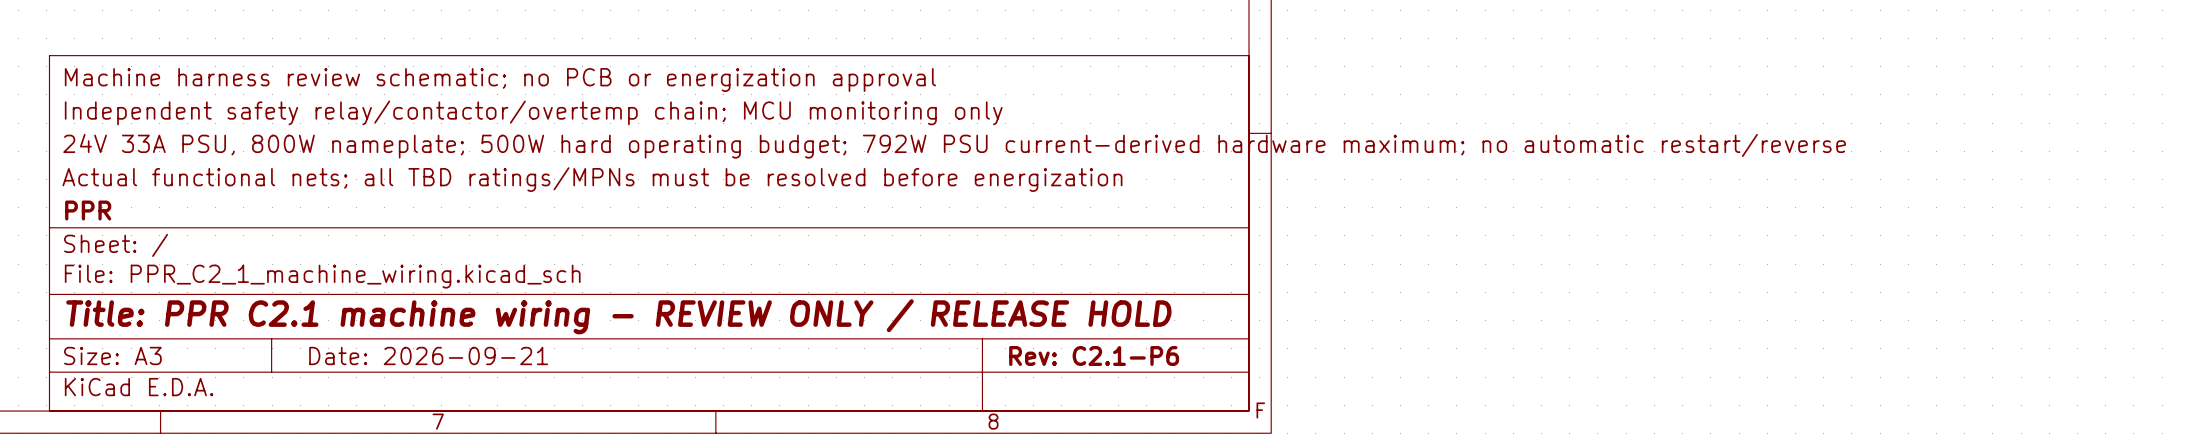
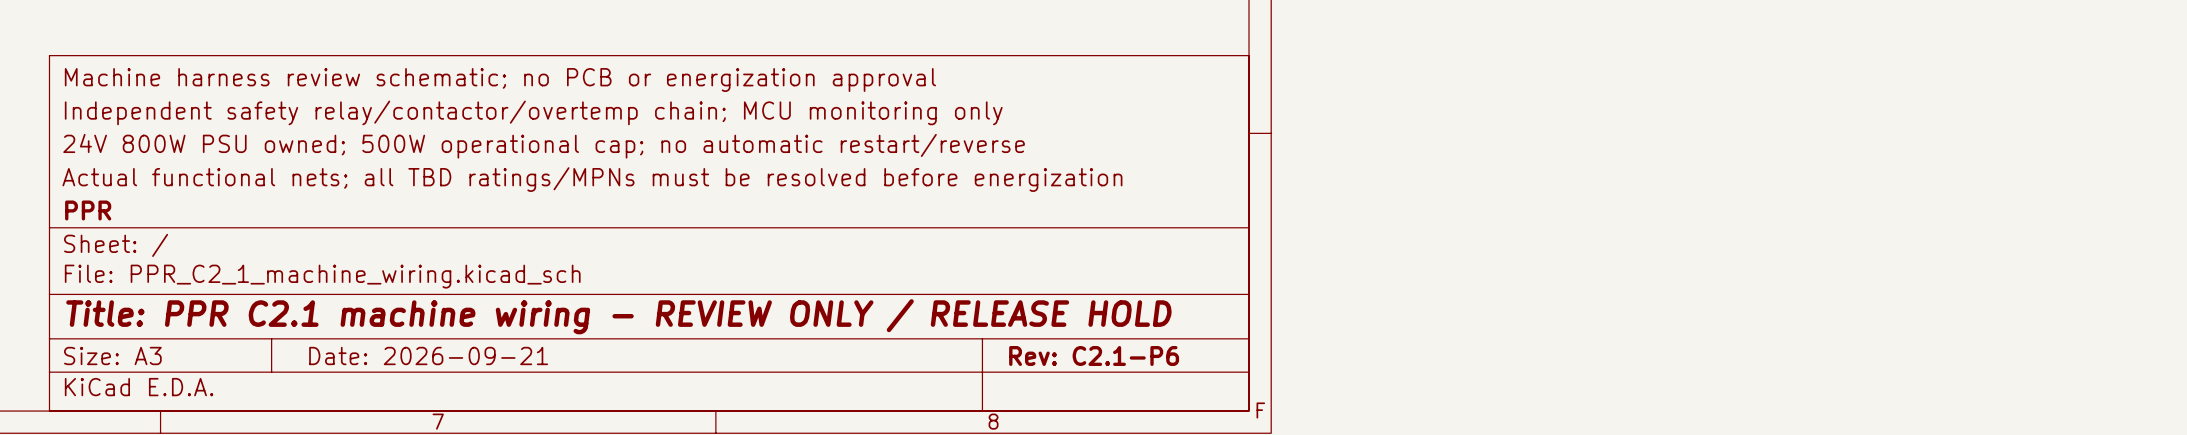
title block: 24V 33A PSU, 800W nameplate; 500W hard operating budget; 792W PSU current-derived hardware maximum; no automatic restart/reverse (954, 146) -> 24V 800W PSU owned; 500W operational cap; no automatic restart/reverse (544, 146)

